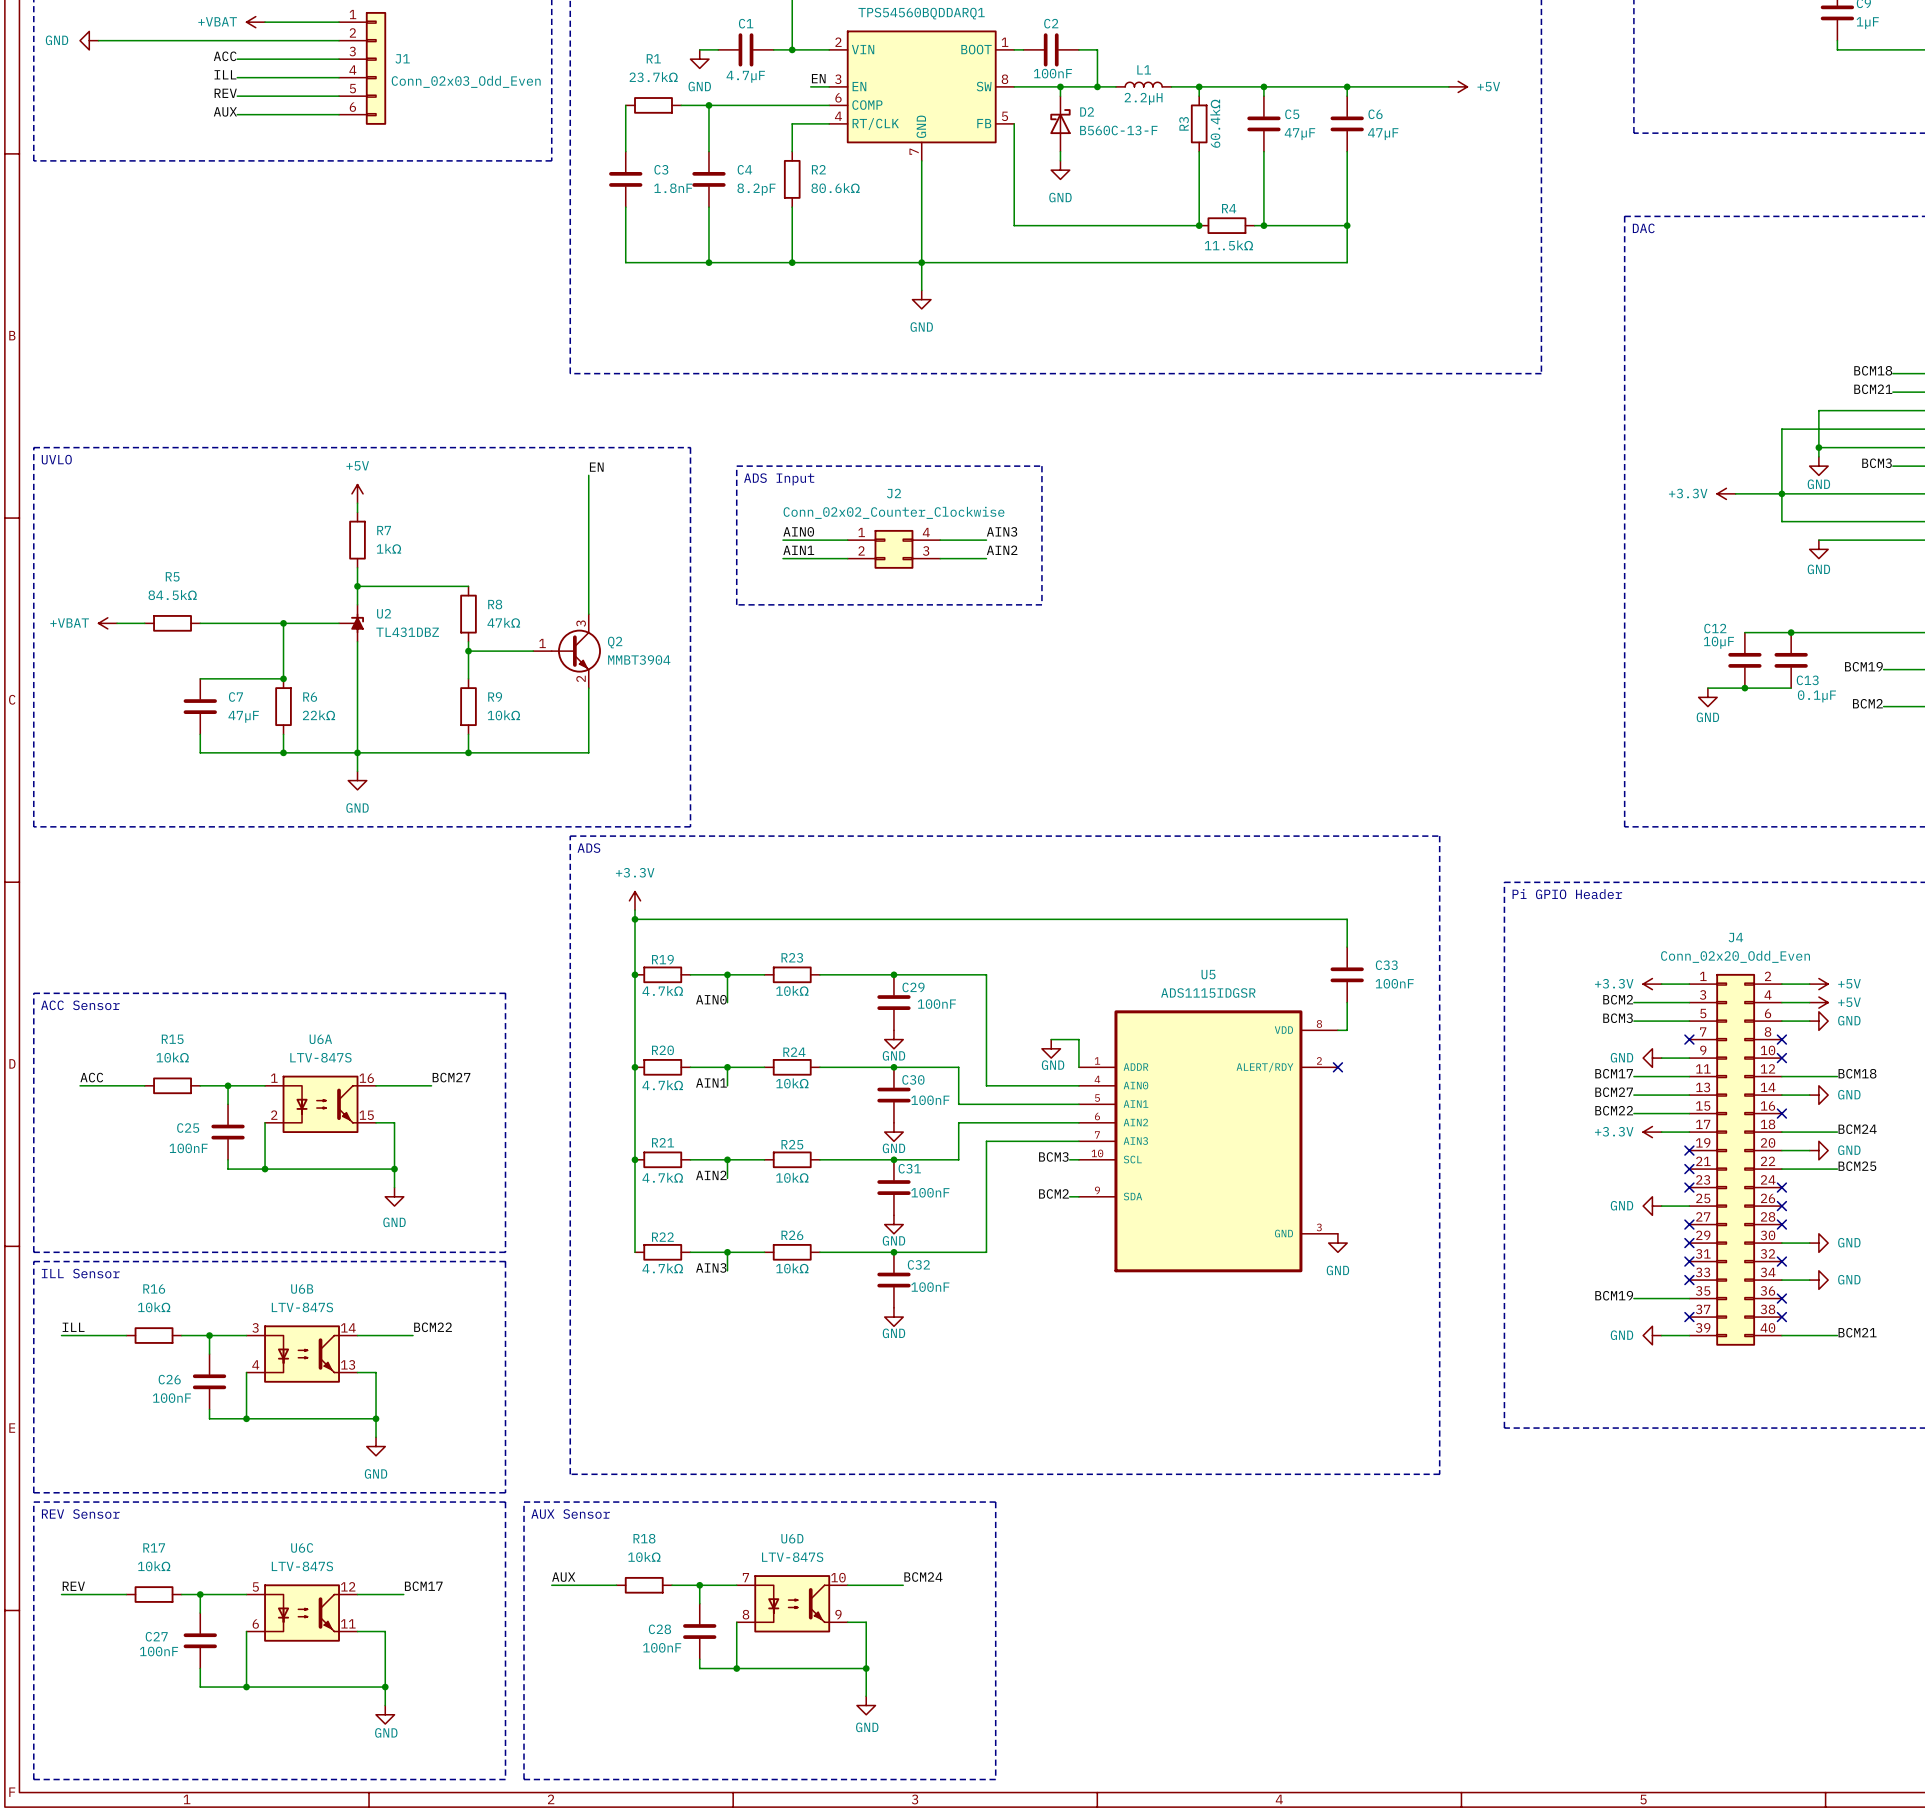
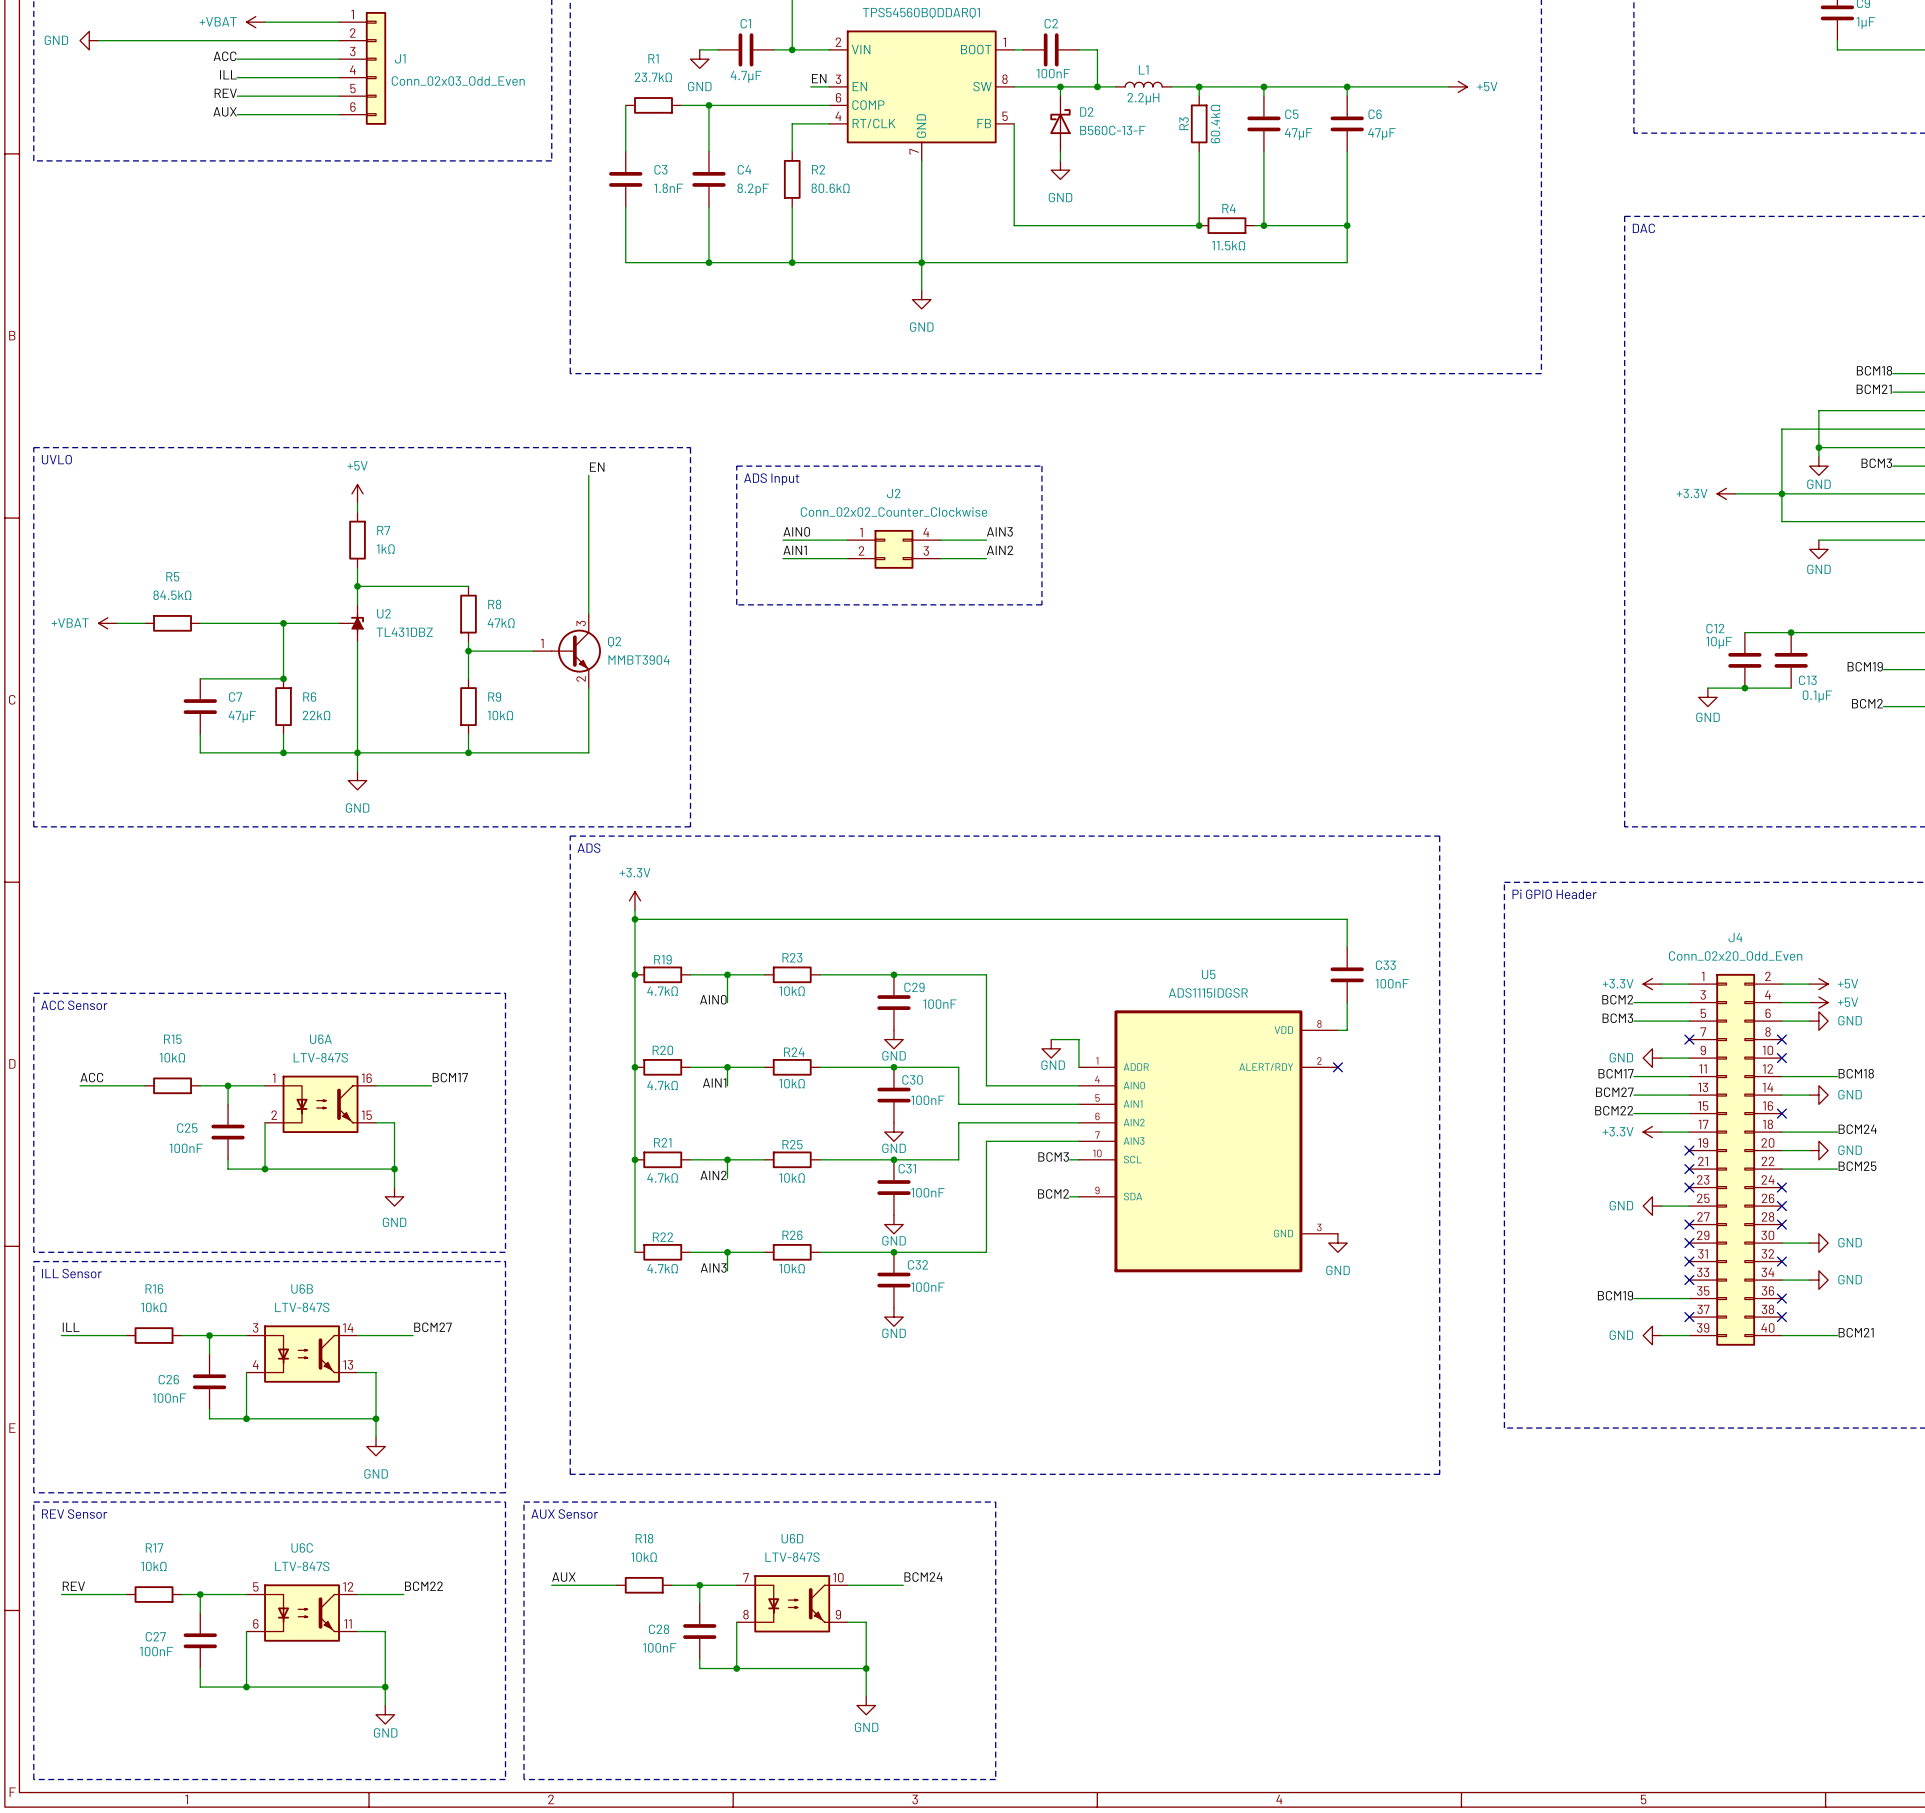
label: BCM27 (451, 1077) -> BCM17 (450, 1077)
label: BCM22 (433, 1327) -> BCM27 (433, 1327)
label: BCM17 (423, 1586) -> BCM22 (423, 1586)

